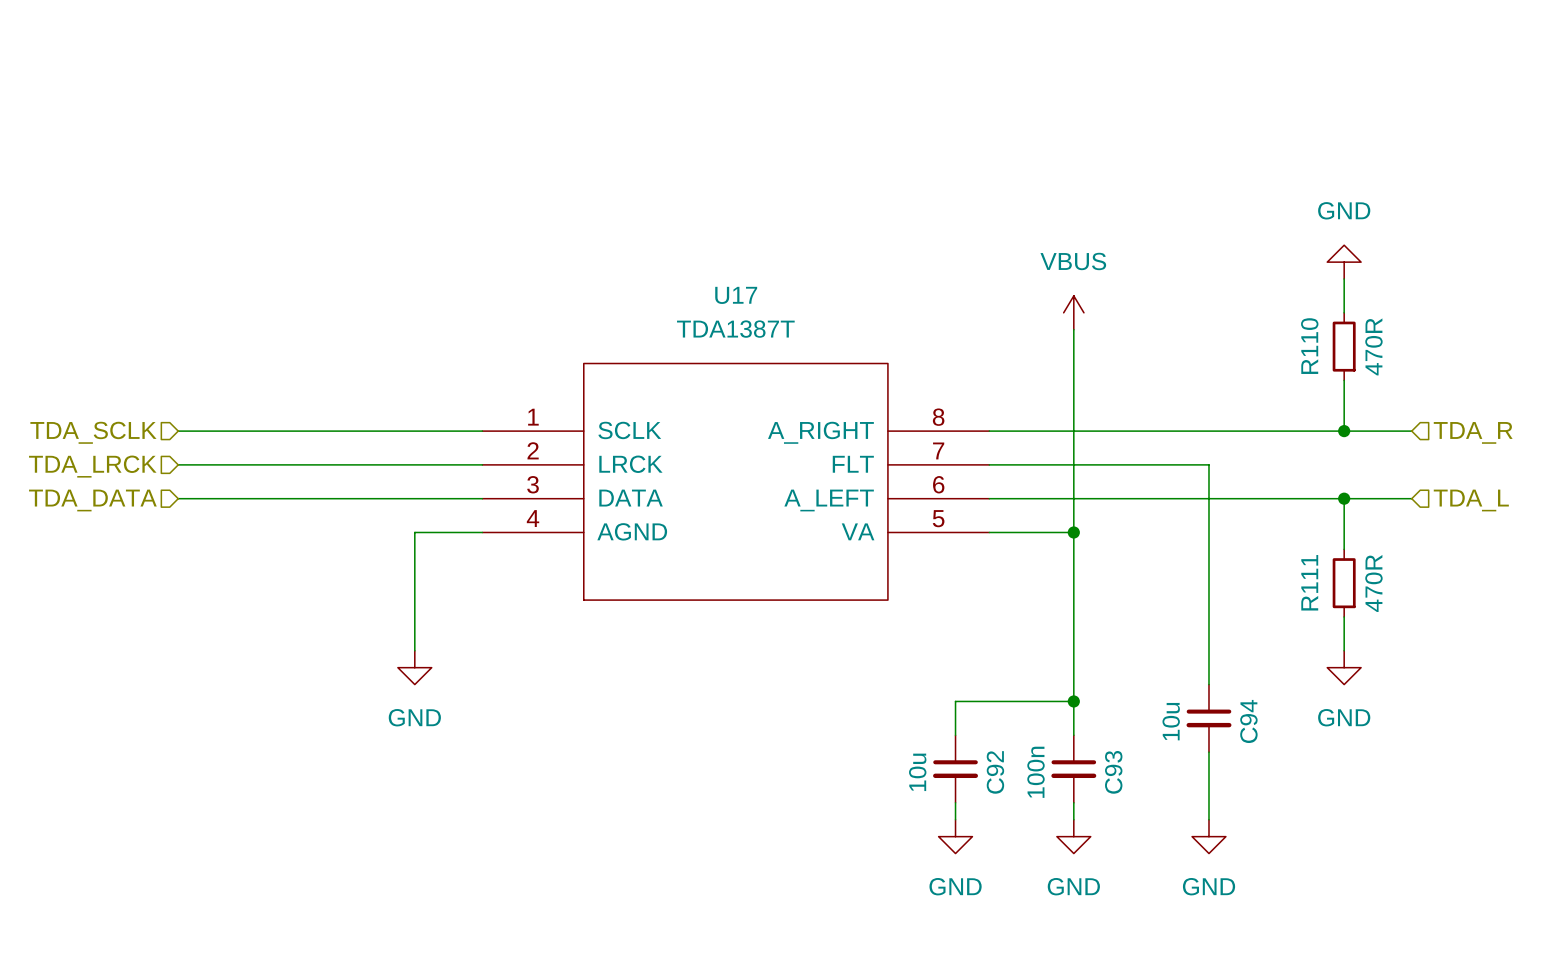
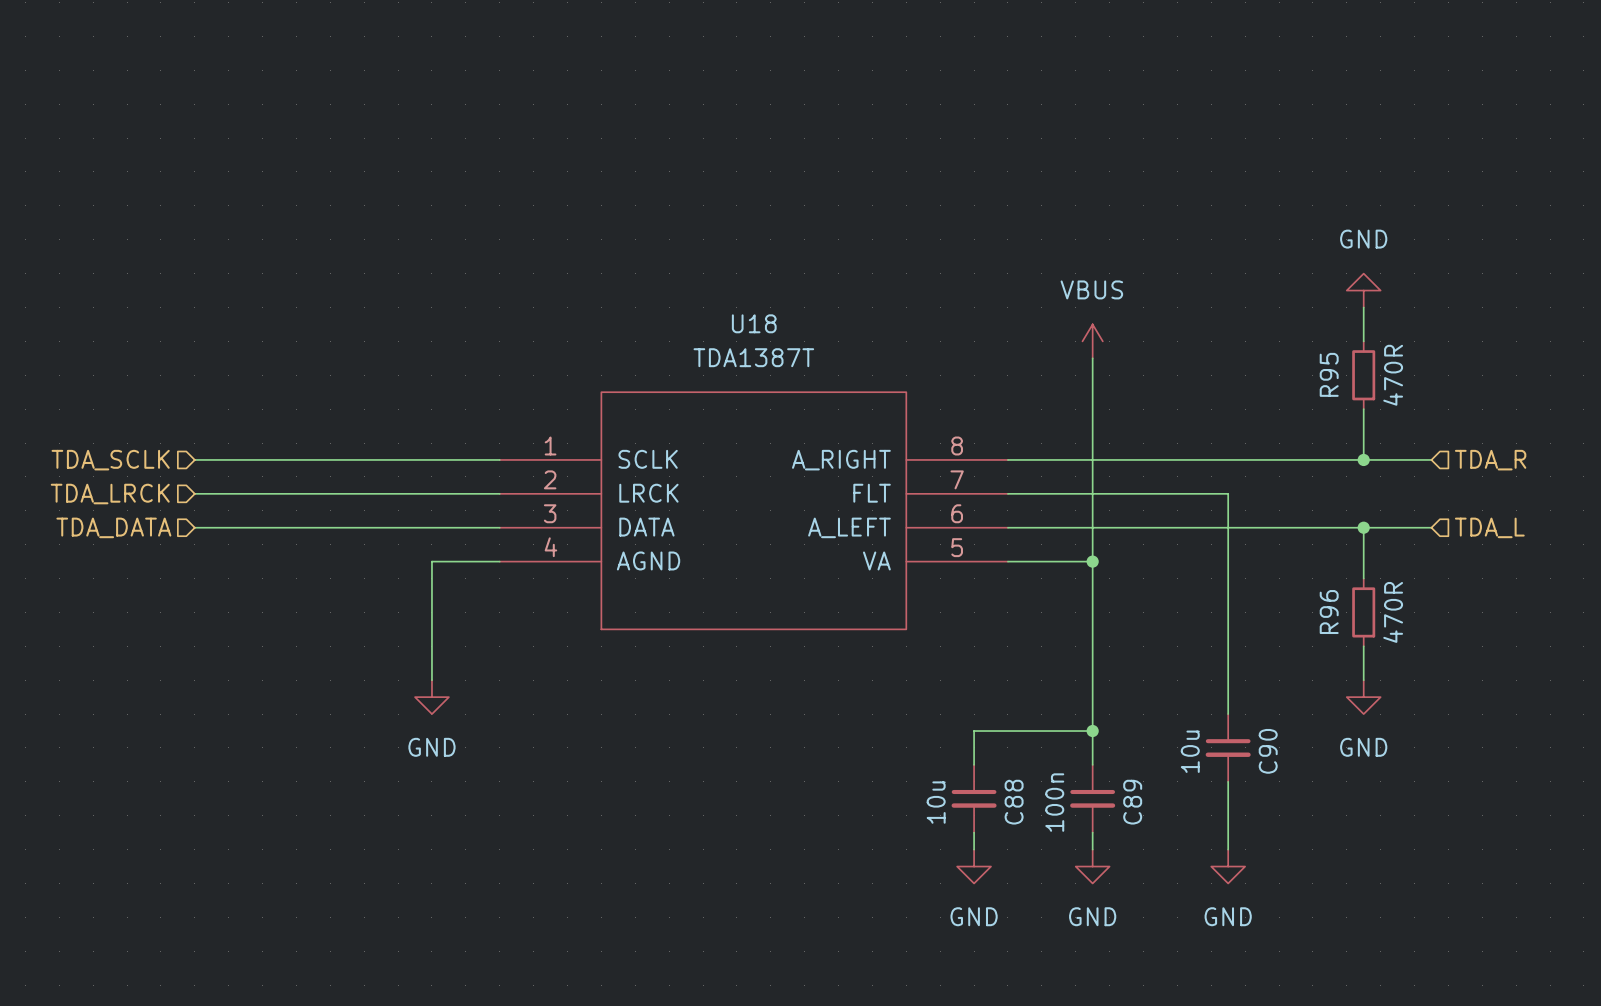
U17 name: U17 (736, 295) -> U18 (754, 323)
R110 name: R110 (1309, 346) -> R95 (1329, 374)
R111 name: R111 (1309, 582) -> R96 (1329, 612)
C94 name: C94 (1248, 721) -> C90 (1268, 751)
C92 name: C92 (995, 772) -> C88 (1014, 802)
C93 name: C93 (1113, 772) -> C89 (1132, 802)

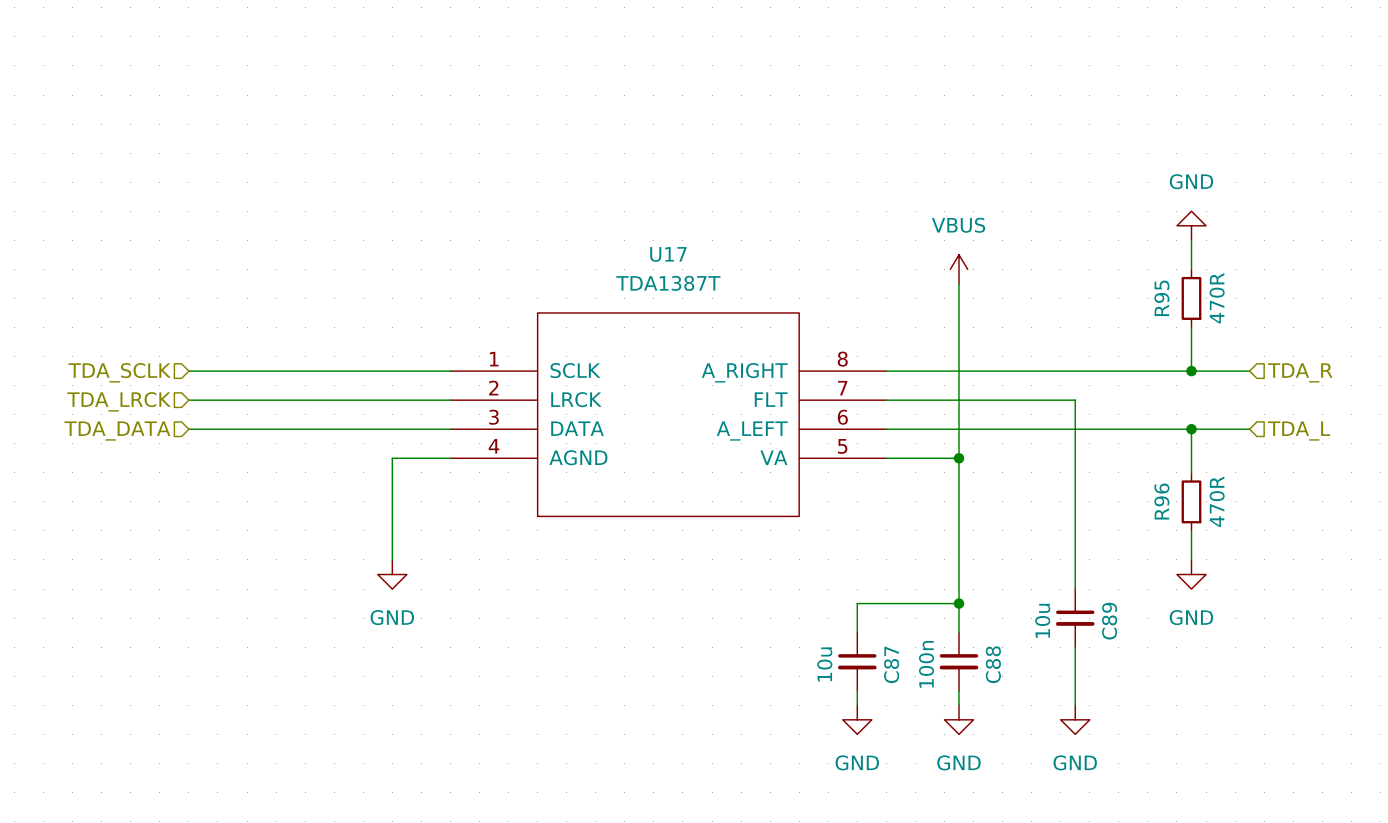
U18 name: U18 (754, 323) -> U17 (668, 254)
C90 name: C90 (1268, 751) -> C89 (1109, 621)
C88 name: C88 (1014, 802) -> C87 (891, 664)
C89 name: C89 (1132, 802) -> C88 (993, 664)

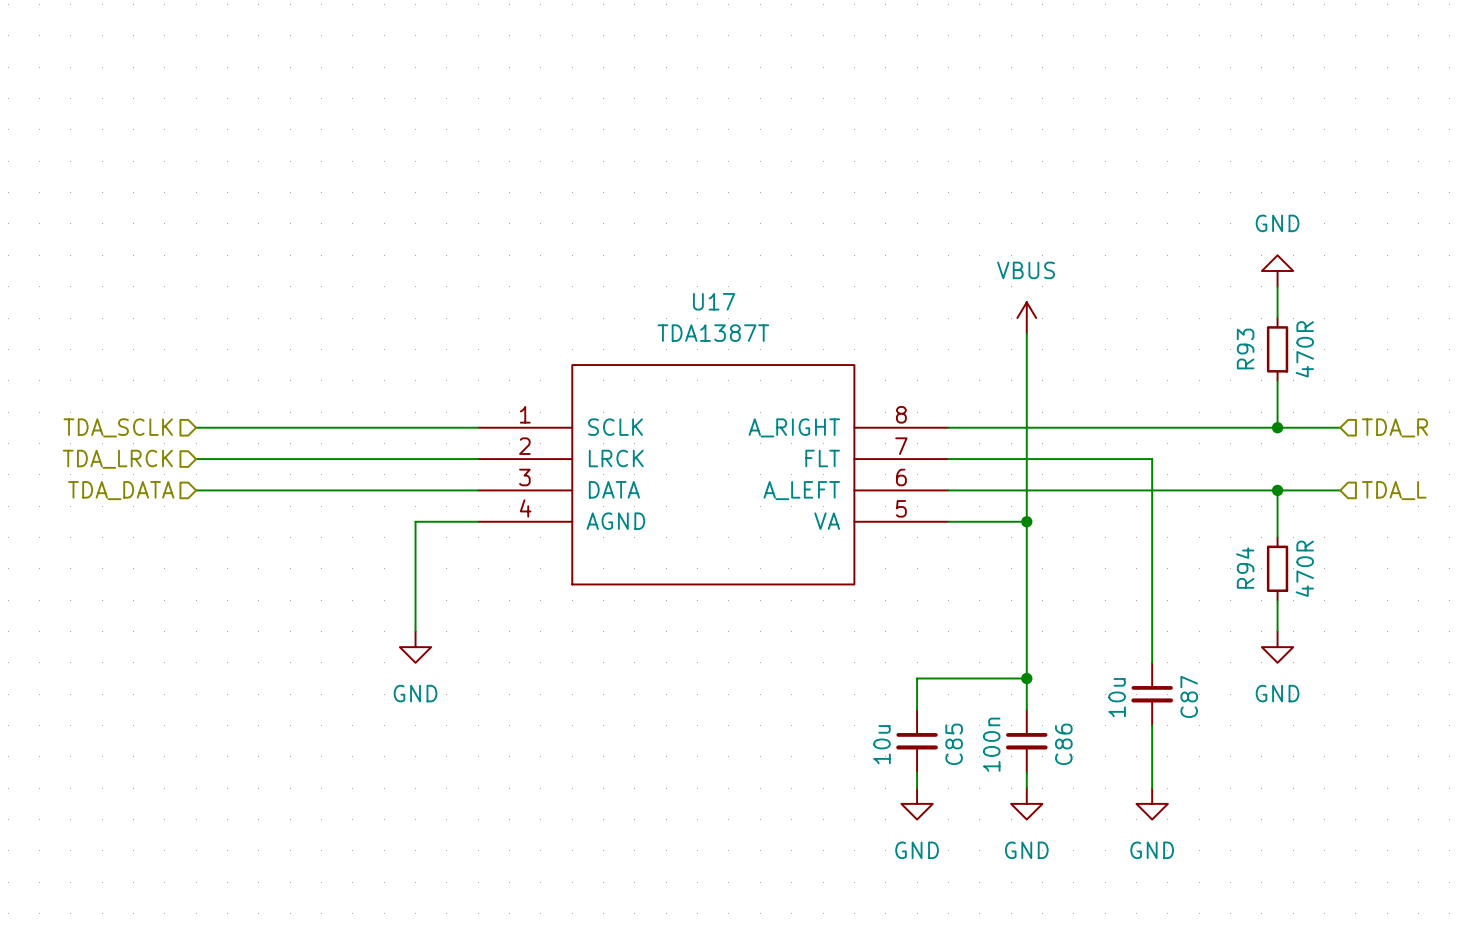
R95 name: R95 (1161, 298) -> R93 (1245, 348)
R96 name: R96 (1161, 501) -> R94 (1245, 568)
C89 name: C89 (1109, 621) -> C87 (1189, 696)
C87 name: C87 (891, 664) -> C85 (954, 744)
C88 name: C88 (993, 664) -> C86 (1063, 744)

